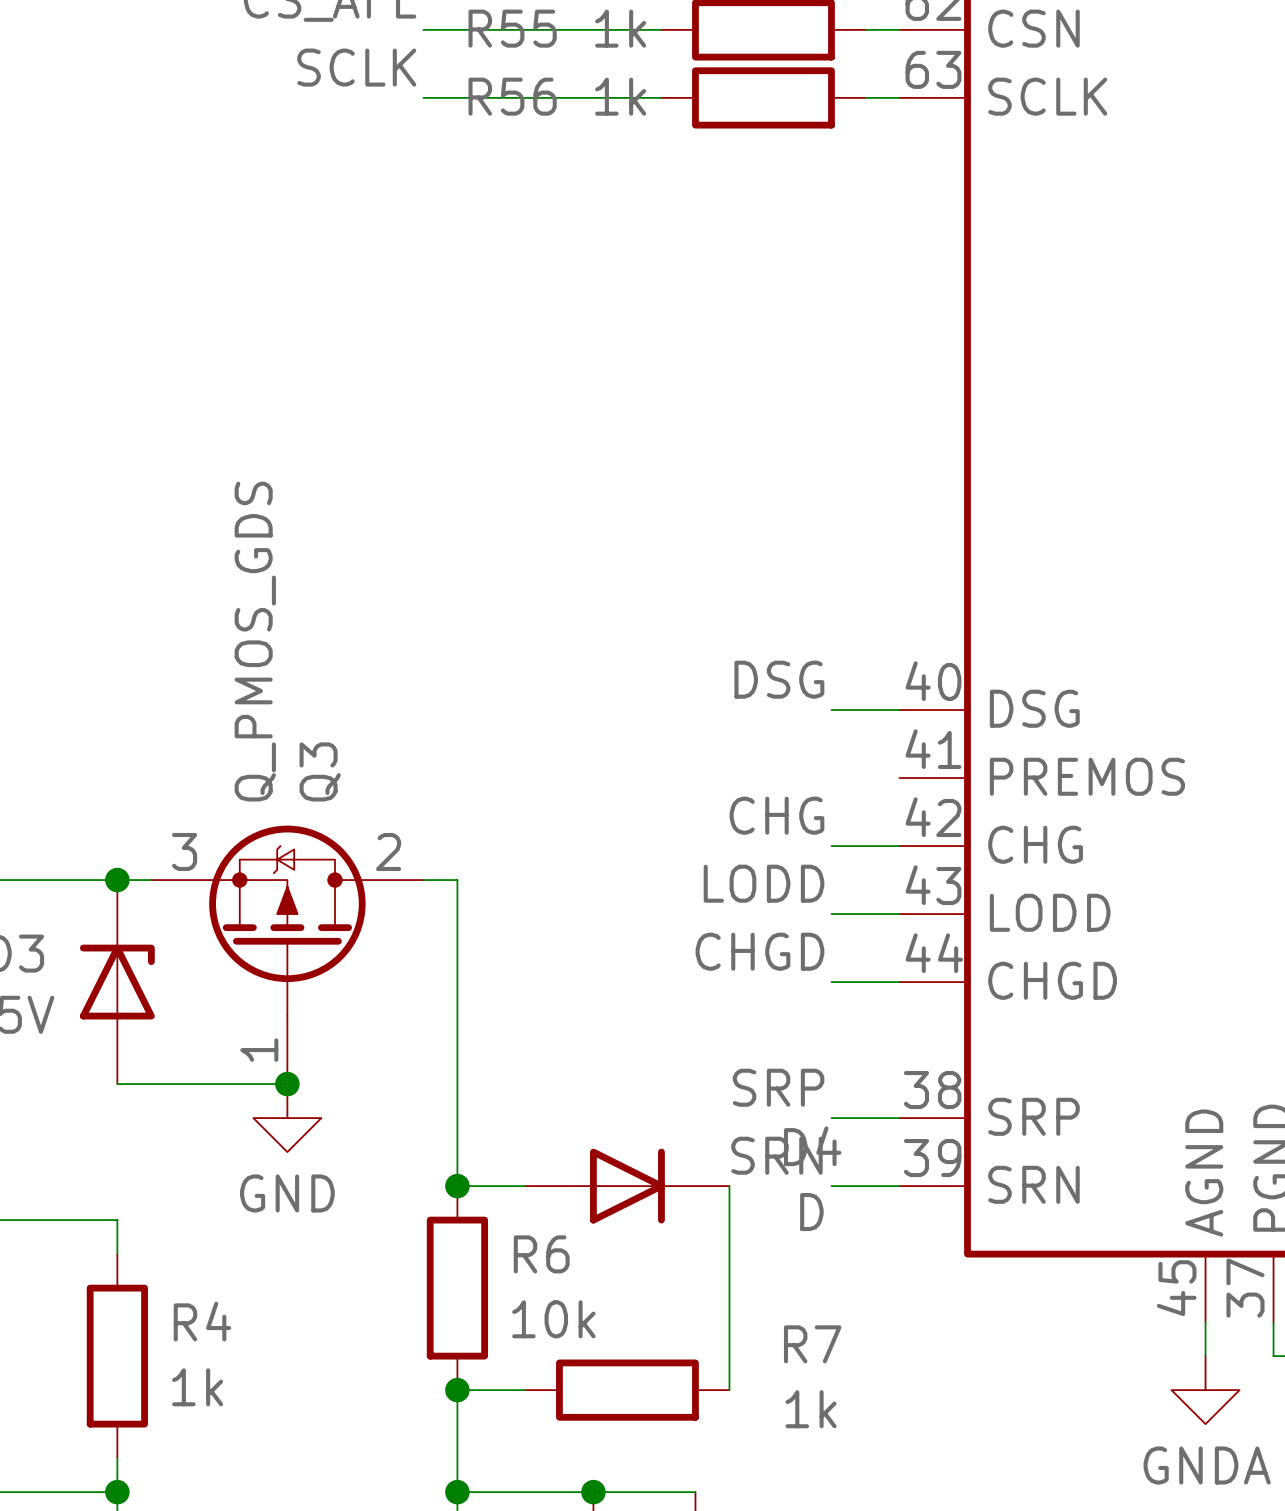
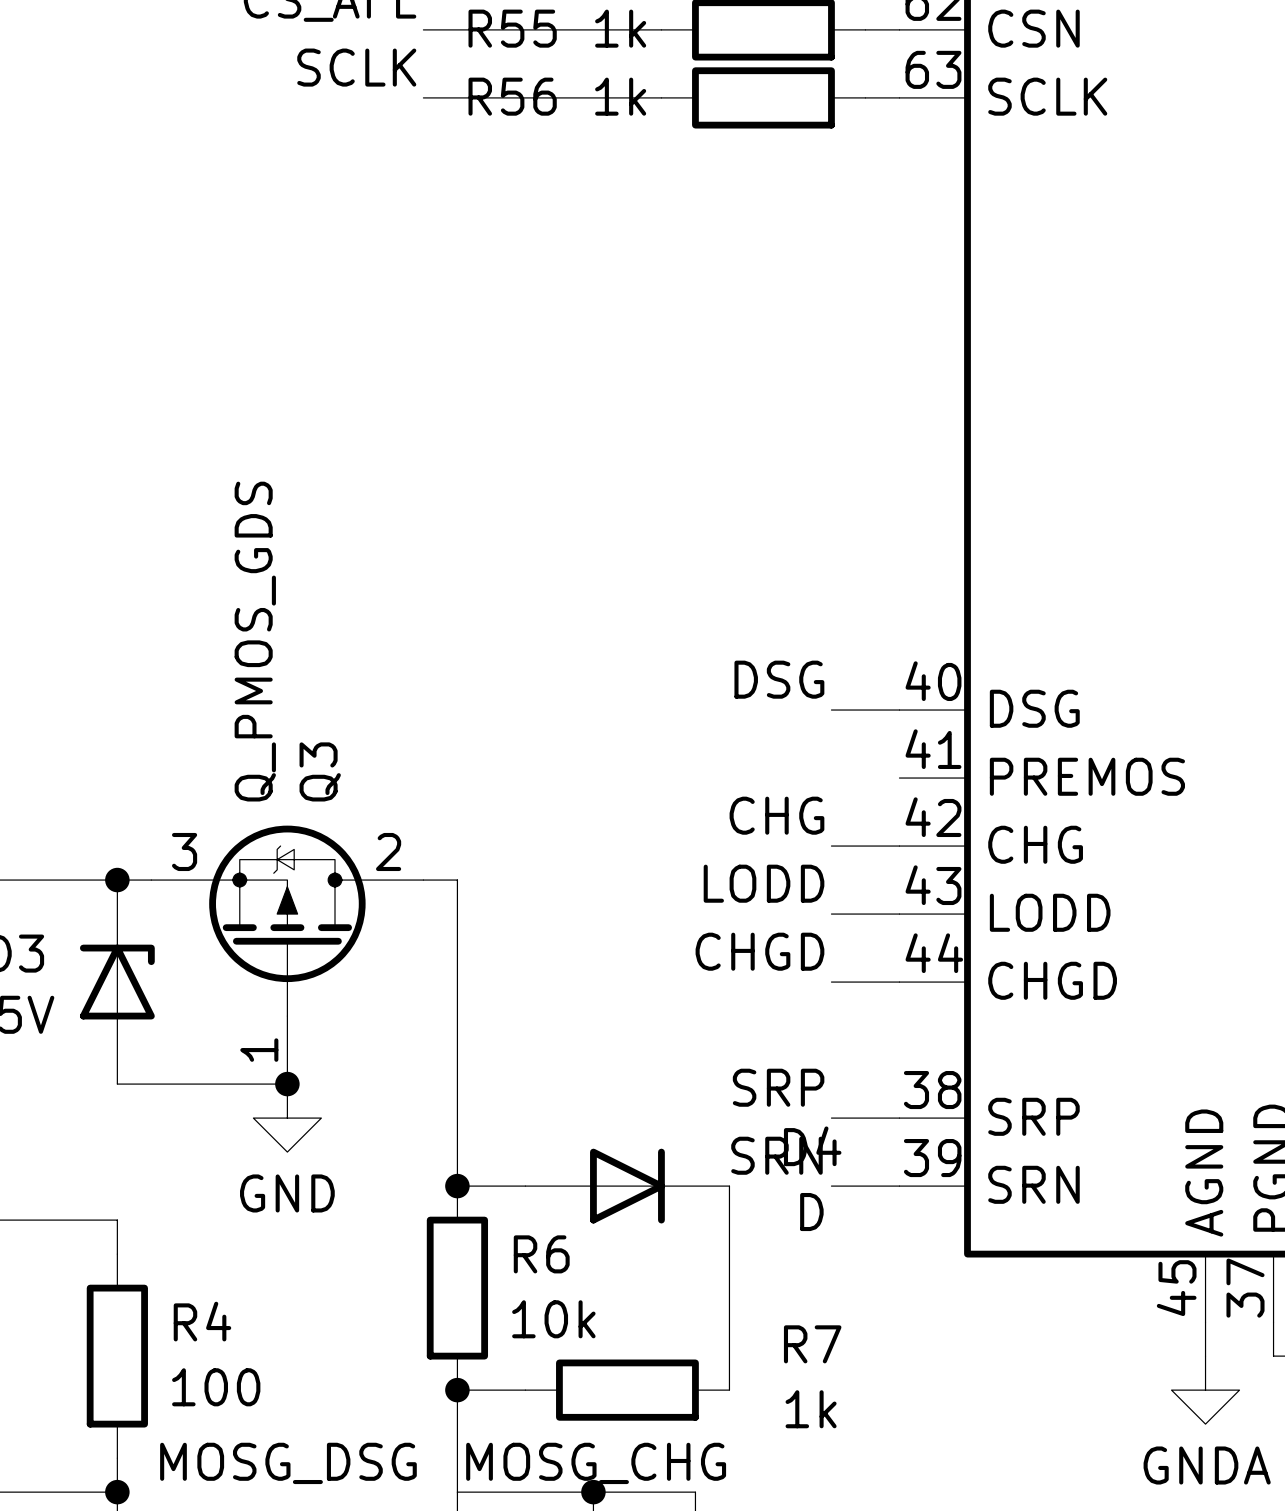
R4 value: 1k (197, 1387) -> 100 (216, 1387)
label: none -> MOSG_DSG (288, 1463)
label: none -> MOSG_CHG (596, 1463)
junction: (457, 1492) -> none

